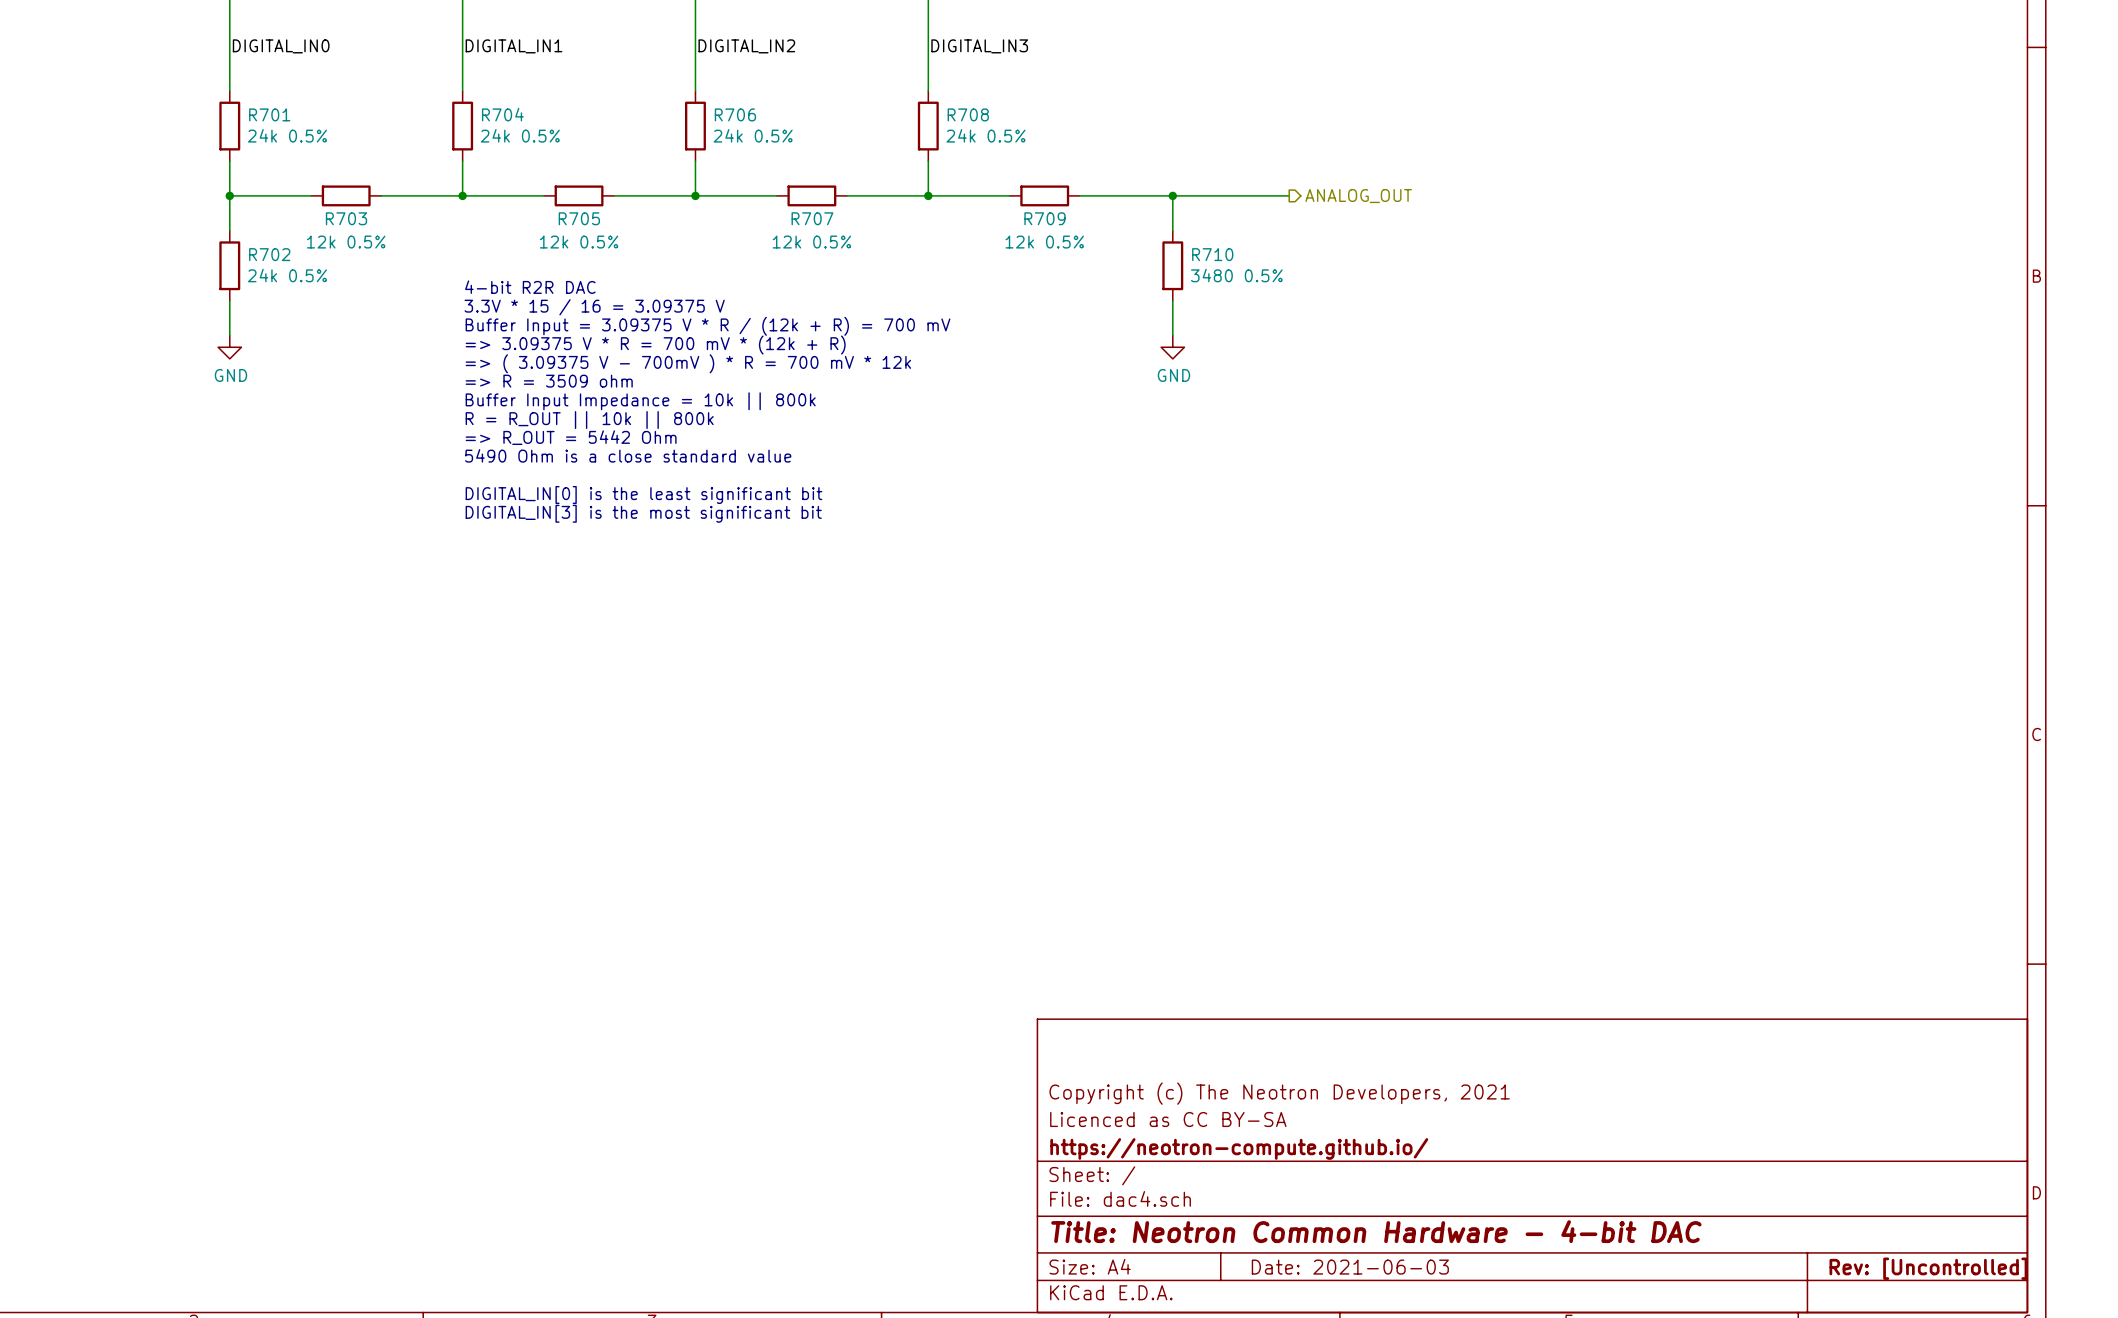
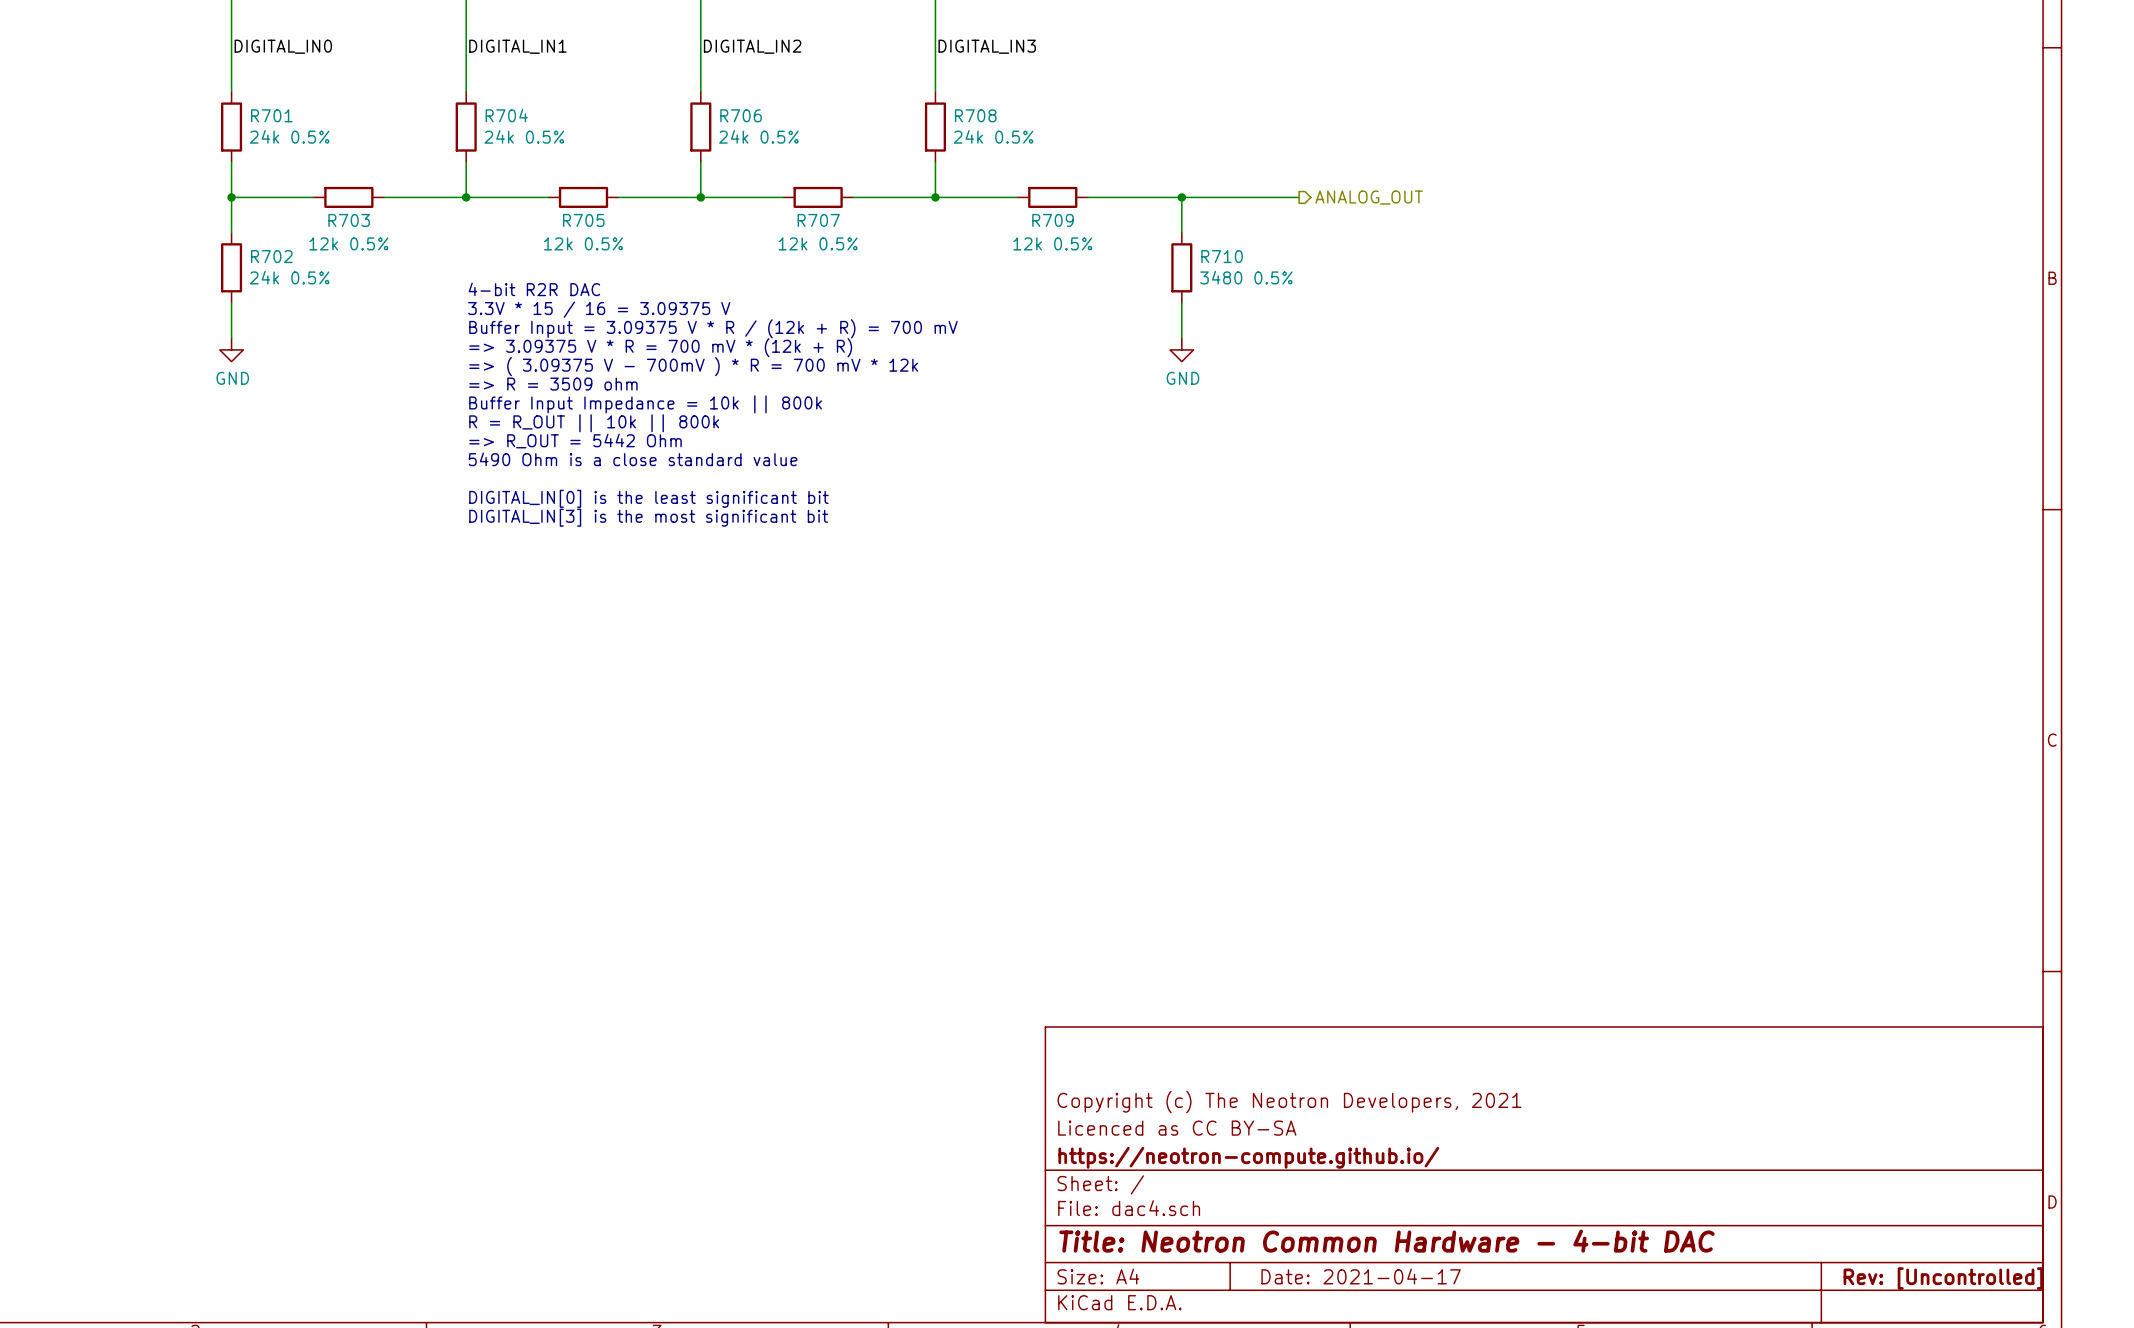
title block: Date: 2021-06-03 (1350, 1267) -> Date: 2021-04-17 (1361, 1276)

